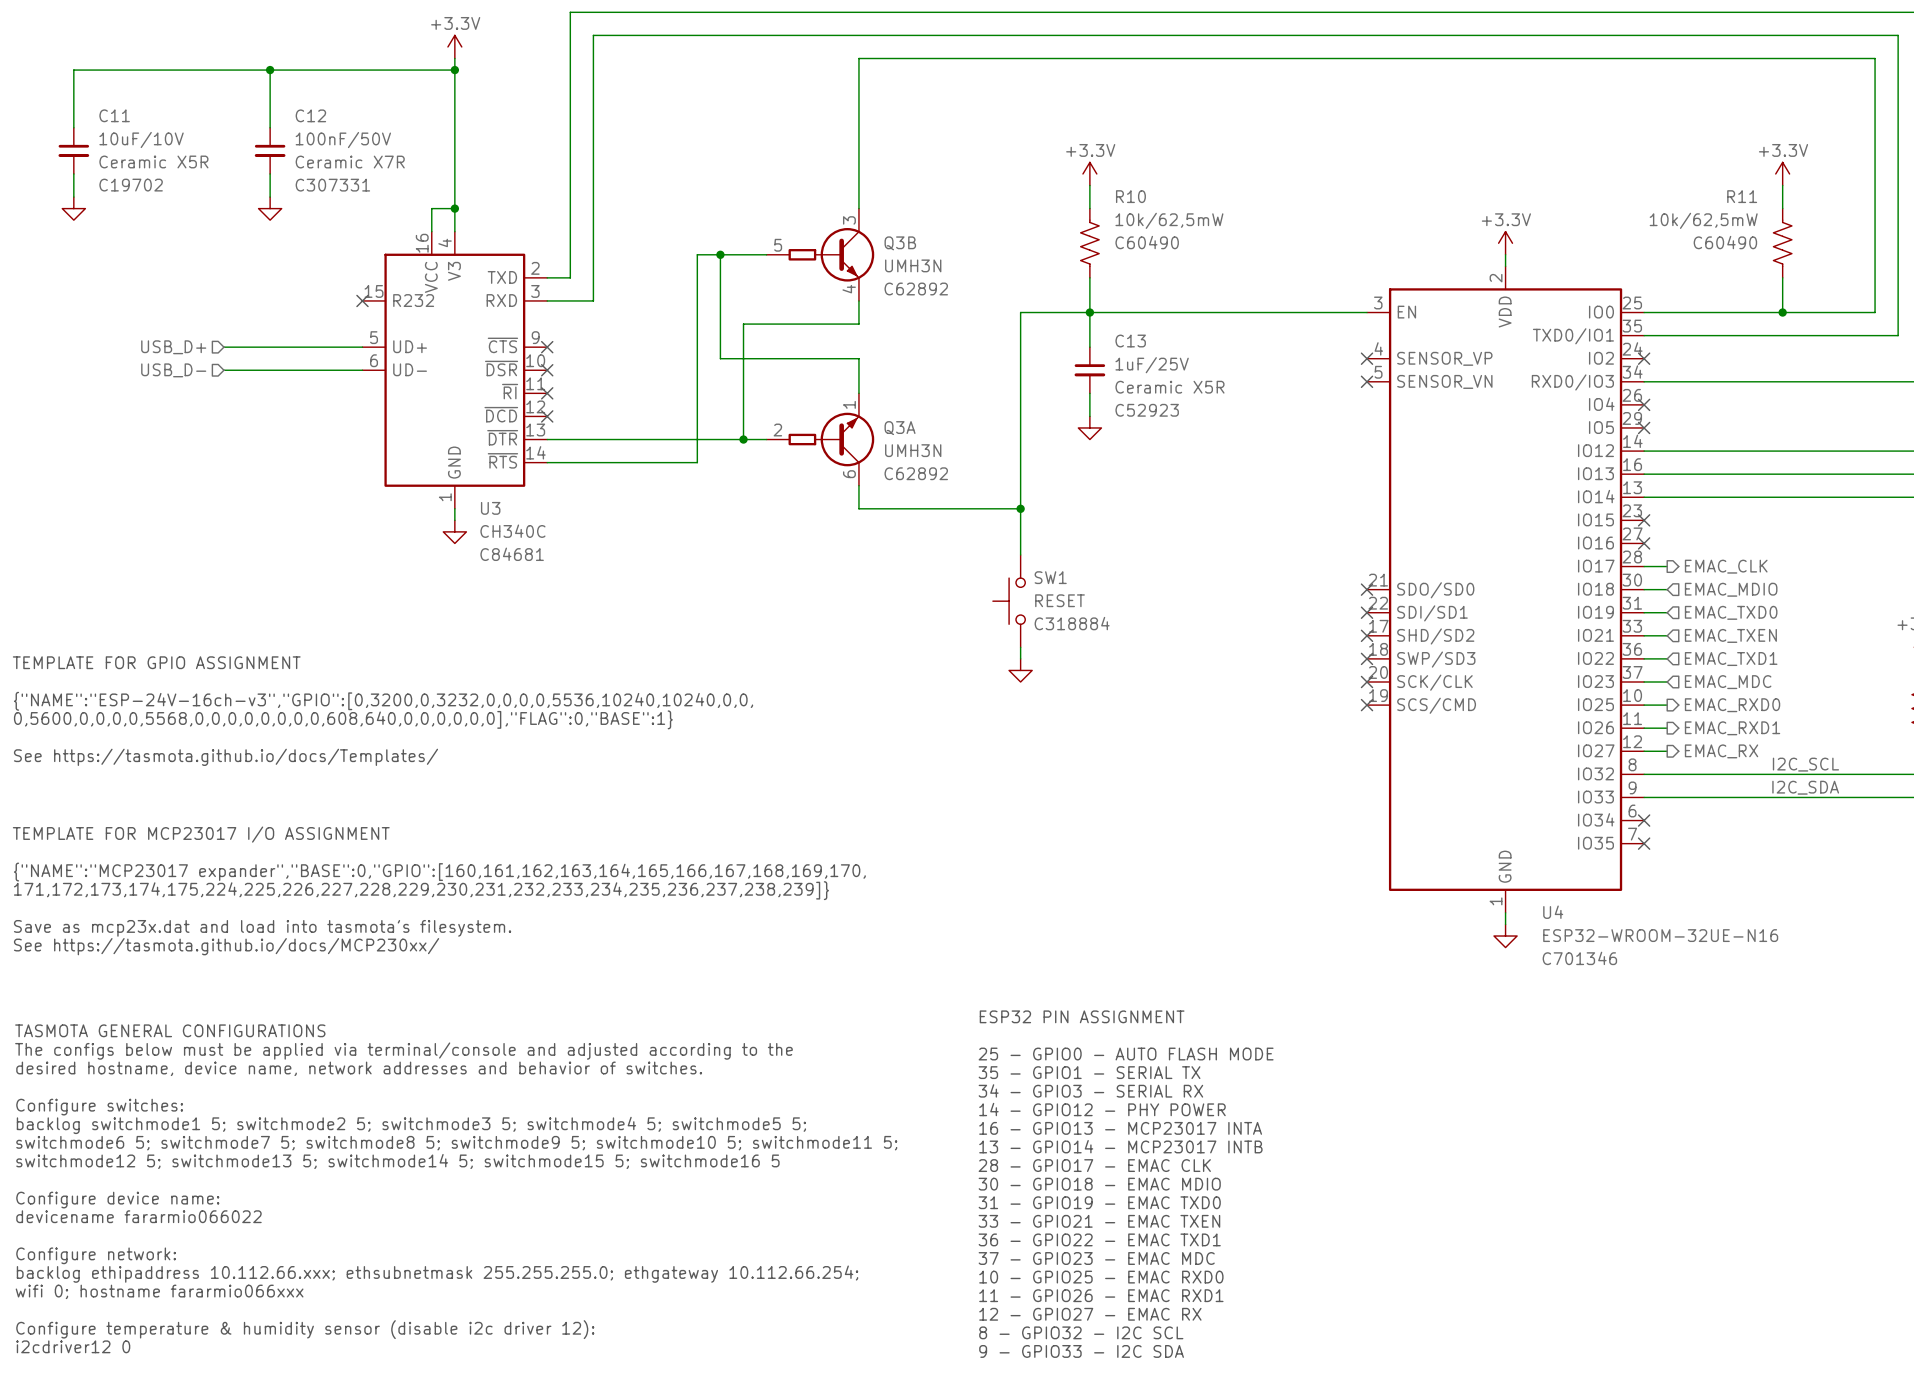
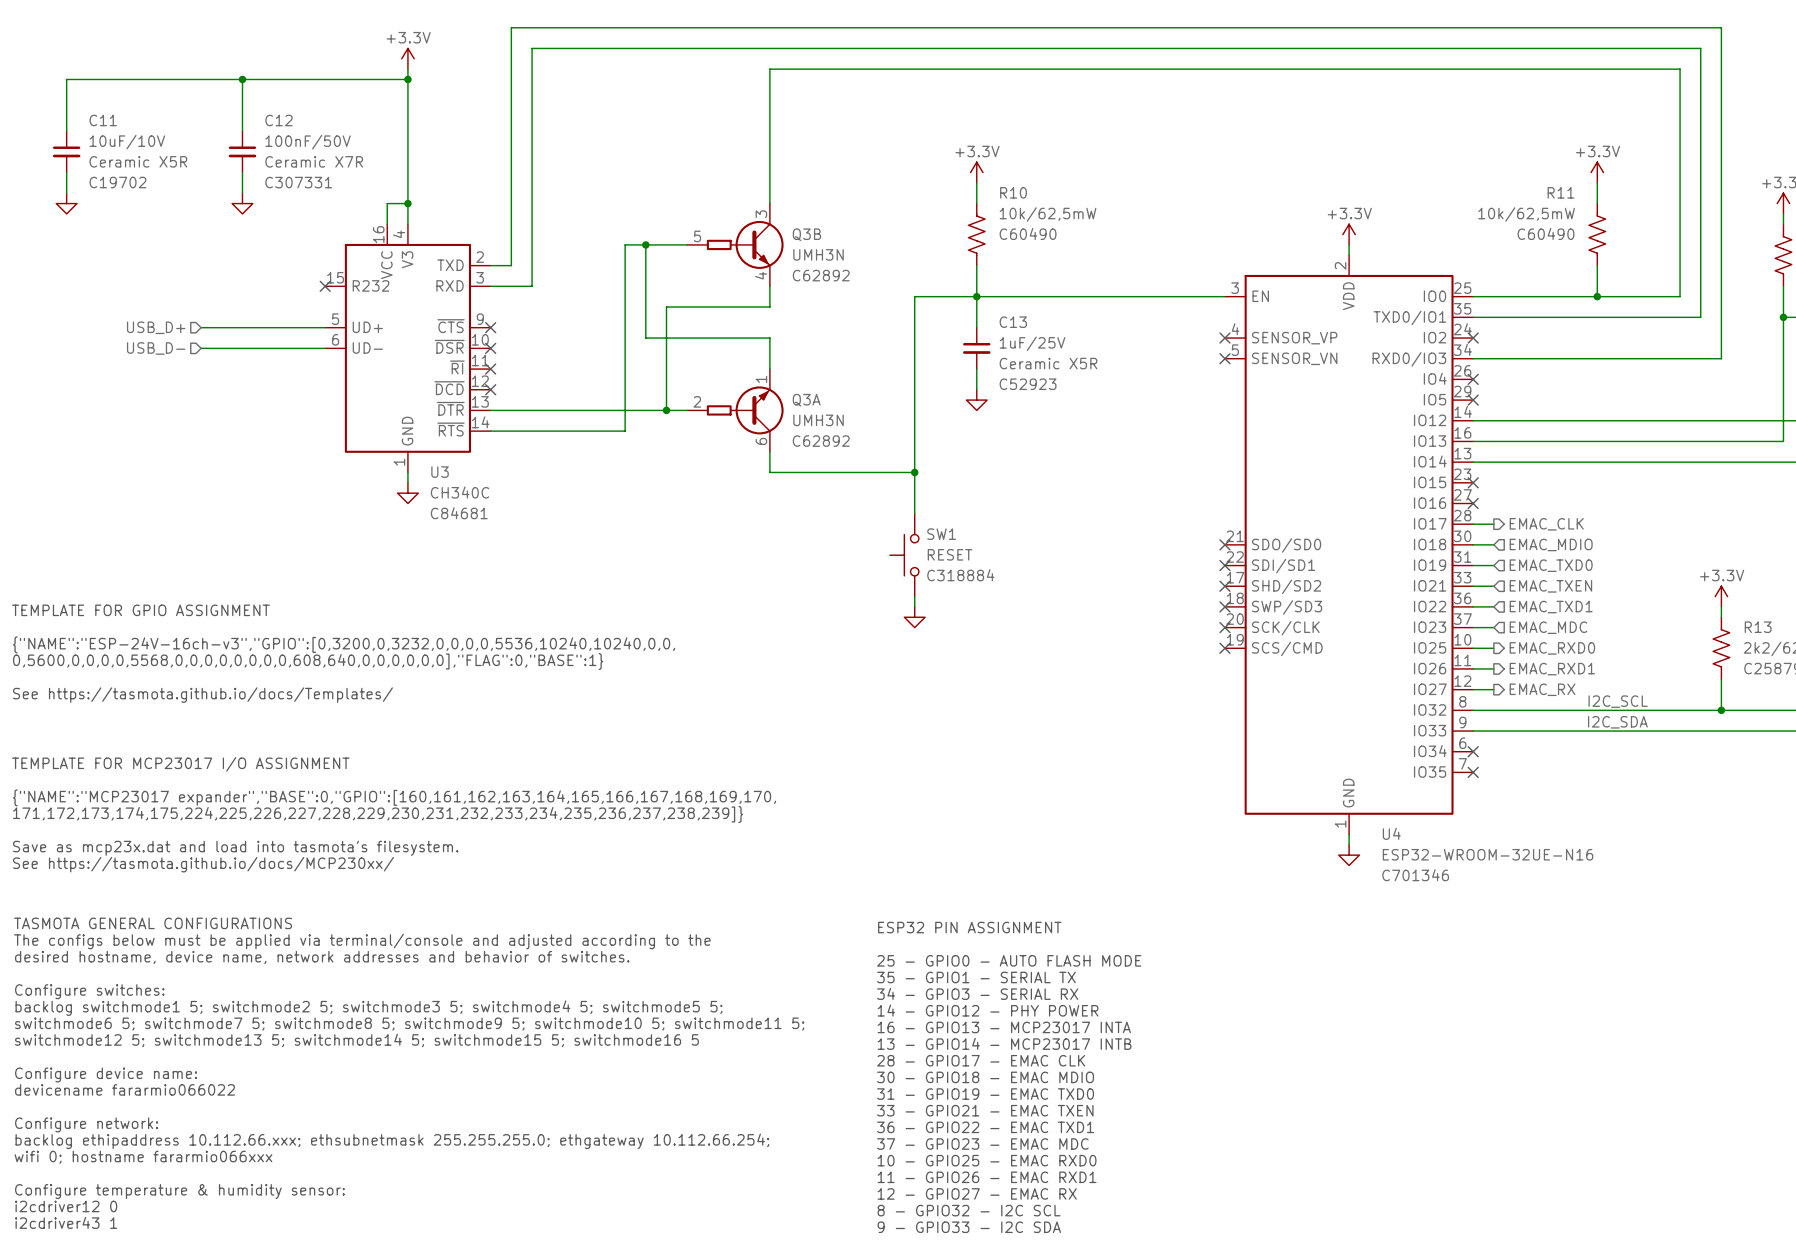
text: none -> TASMOTA GENERAL CONFIGURATIONS (153, 923)
text: TASMOTA GENERAL CONFIGURATIONS (170, 1030) -> The configs below must be applied via terminal/console and adjusted according to the (362, 941)
text: The configs below must be applied via terminal/console and adjusted according to the (403, 1051) -> desired hostname, device name, network addresses and behavior of switches. (322, 957)
text: desired hostname, device name, network addresses and behavior of switches. (359, 1068) -> none
text: none -> Configure switches: (89, 991)
text: Configure switches: (99, 1107) -> backlog switchmode1 5; switchmode2 5; switchmode3 5; switchmode4 5; switchmode5 5; (369, 1008)
text: backlog switchmode1 5; switchmode2 5; switchmode3 5; switchmode4 5; switchmode5 5; (411, 1125) -> switchmode6 5; switchmode7 5; switchmode8 5; switchmode9 5; switchmode10 5; switchmode11 5; (409, 1024)
text: switchmode6 5; switchmode7 5; switchmode8 5; switchmode9 5; switchmode10 5; switchmode11 5; (456, 1143) -> switchmode12 5; switchmode13 5; switchmode14 5; switchmode15 5; switchmode16 5 (356, 1040)
text: switchmode12 5; switchmode13 5; switchmode14 5; switchmode15 5; switchmode16 5 (397, 1161) -> none
text: none -> Configure device name: (106, 1074)
text: Configure device name: (117, 1200) -> devicename fararmio066022 (124, 1089)
text: devicename fararmio066022 (138, 1216) -> none
text: none -> Configure network: (86, 1124)
text: Configure network: (96, 1255) -> backlog ethipaddress 10.112.66.xxx; ethsubnetmask 255.255.255.0; ethgateway 10.112.66.254; (392, 1141)
text: backlog ethipaddress 10.112.66.xxx; ethsubnetmask 255.255.255.0; ethgateway 10.112.66.254; (437, 1274) -> wifi 0; hostname fararmio066xxx (143, 1157)
text: wifi 0; hostname fararmio066xxx (159, 1291) -> none
text: none -> Configure temperature & humidity sensor: (179, 1191)
text: Configure temperature & humidity sensor (disable i2c driver 12): (305, 1329) -> i2cdriver12 0 (66, 1206)
text: i2cdriver12 0 (73, 1346) -> i2cdriver43 1 (66, 1222)

